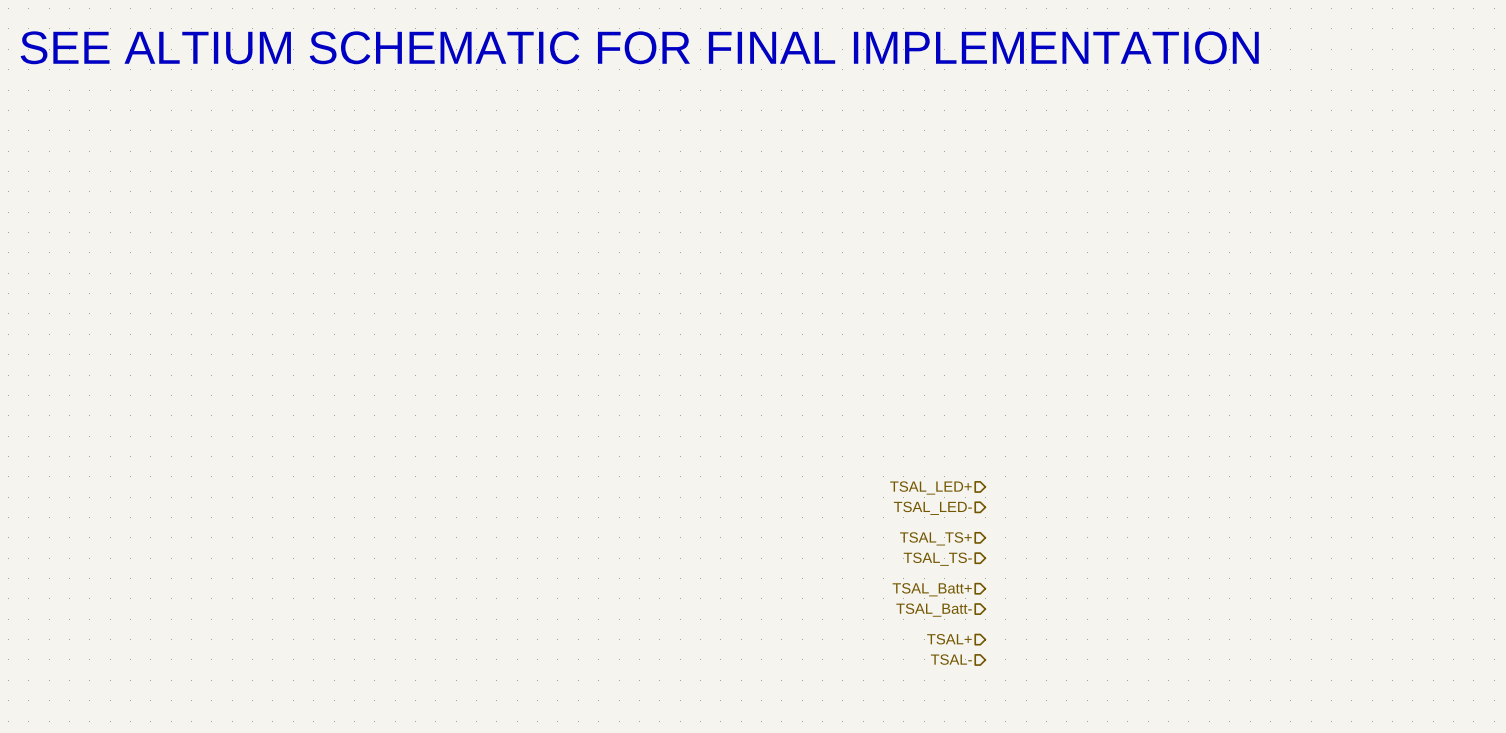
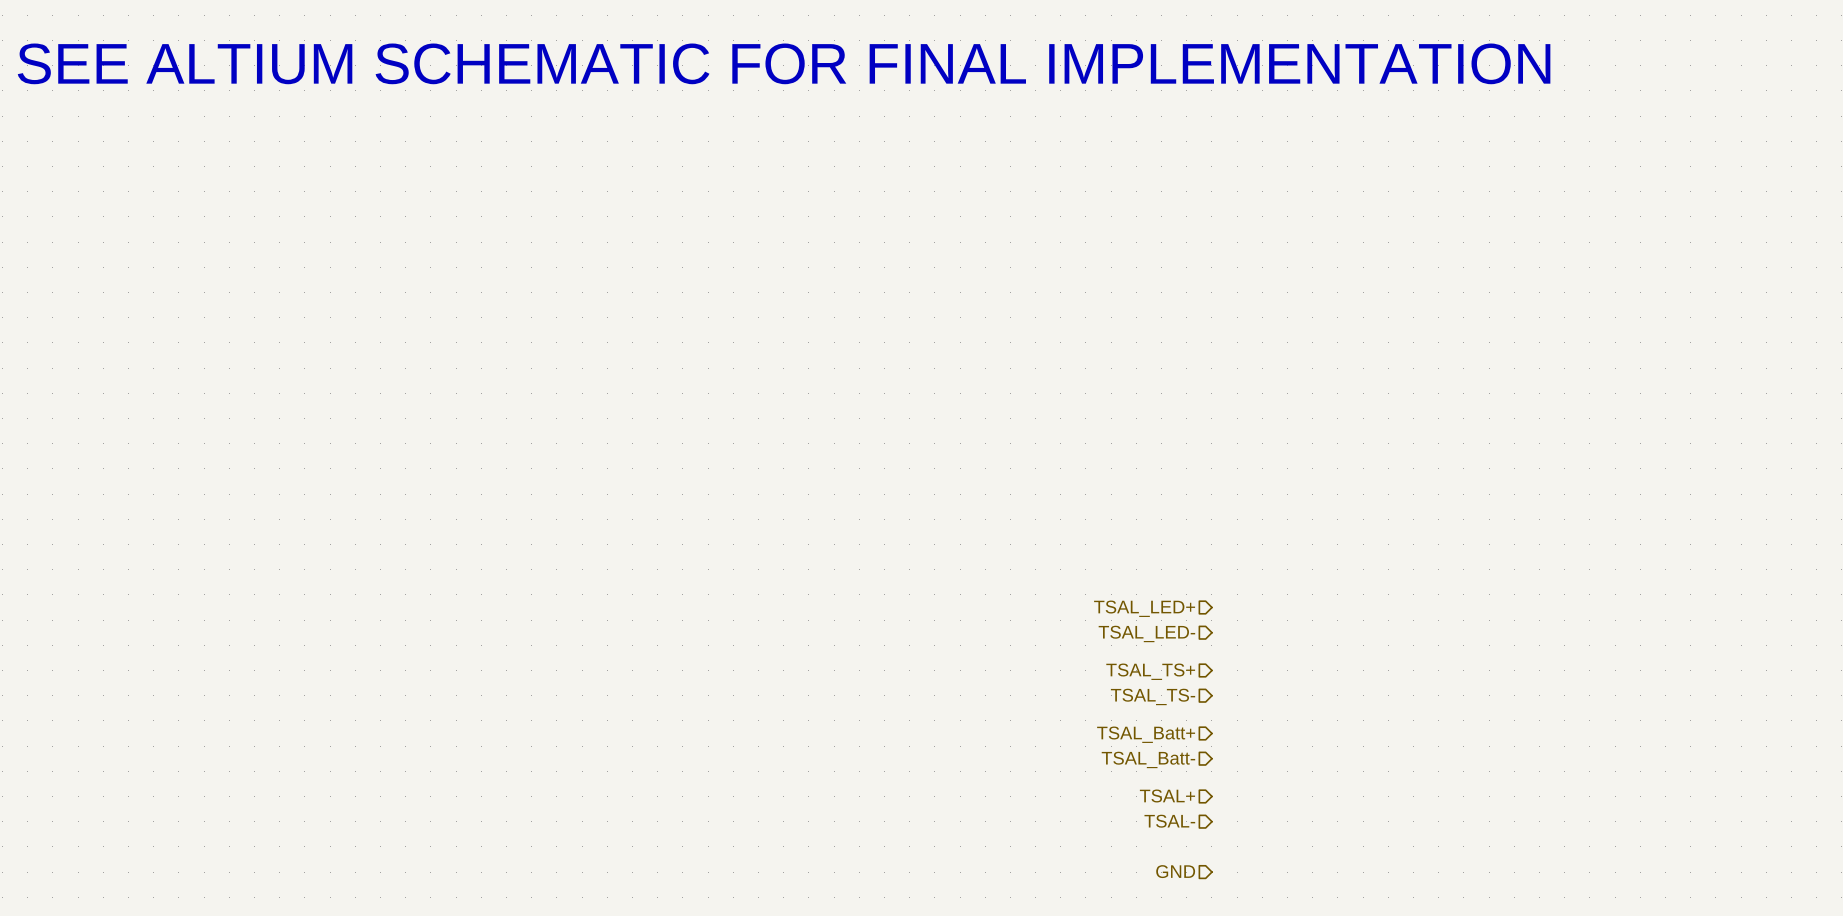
hierarchical label: none -> GND (1175, 871)

